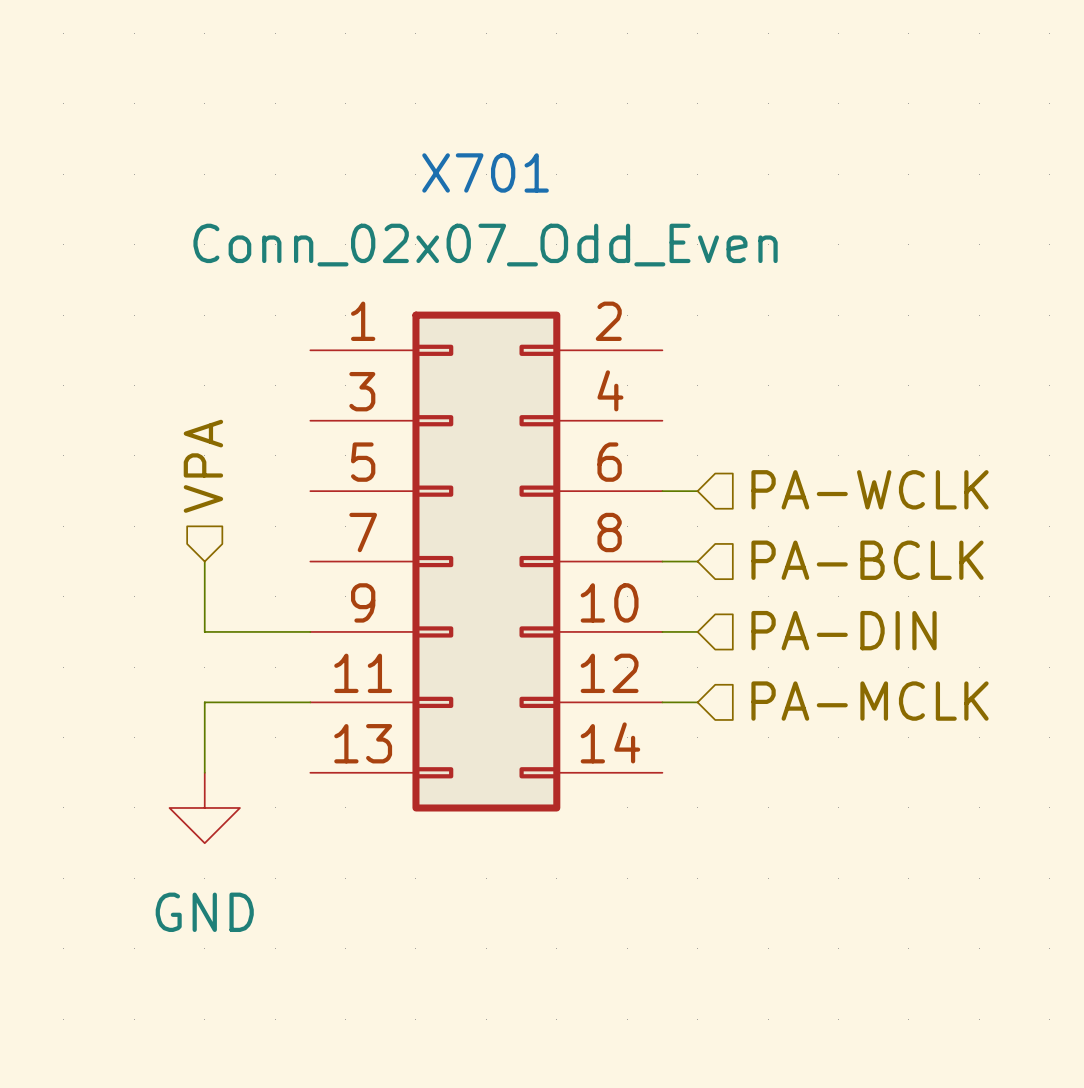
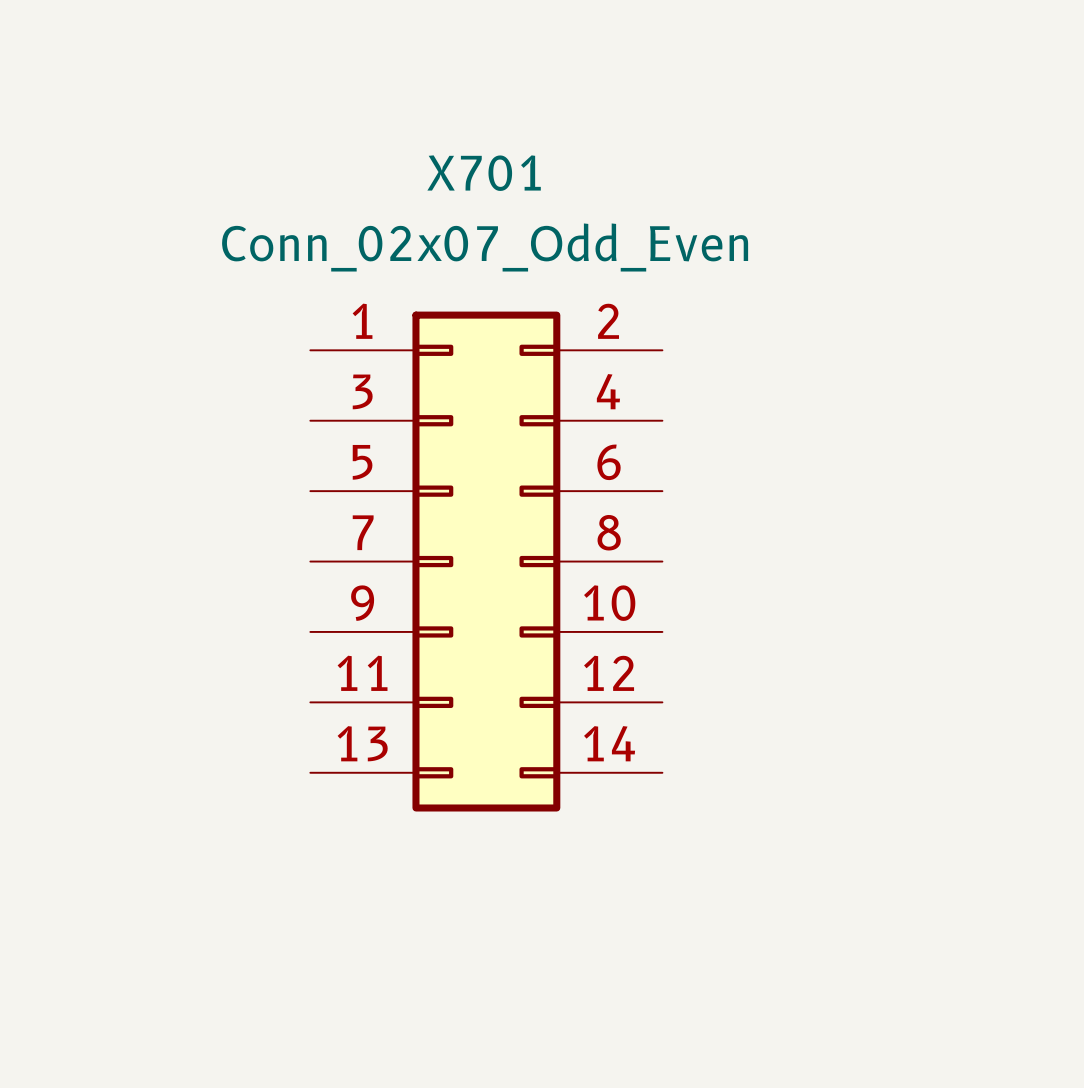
hierarchical label: VPA (203, 466) -> none
hierarchical label: PA-WCLK (870, 489) -> none
wire: (662, 491) (697, 491) -> none
hierarchical label: PA-BCLK (867, 560) -> none
wire: (204, 561) (204, 631) (310, 631) -> none
wire: (662, 561) (697, 561) -> none
hierarchical label: PA-DIN (844, 630) -> none
wire: (662, 631) (697, 631) -> none
hierarchical label: PA-MCLK (870, 701) -> none
wire: (310, 702) (204, 702) (204, 772) -> none
wire: (662, 702) (697, 702) -> none
power symbol: GND (204, 807) -> none

